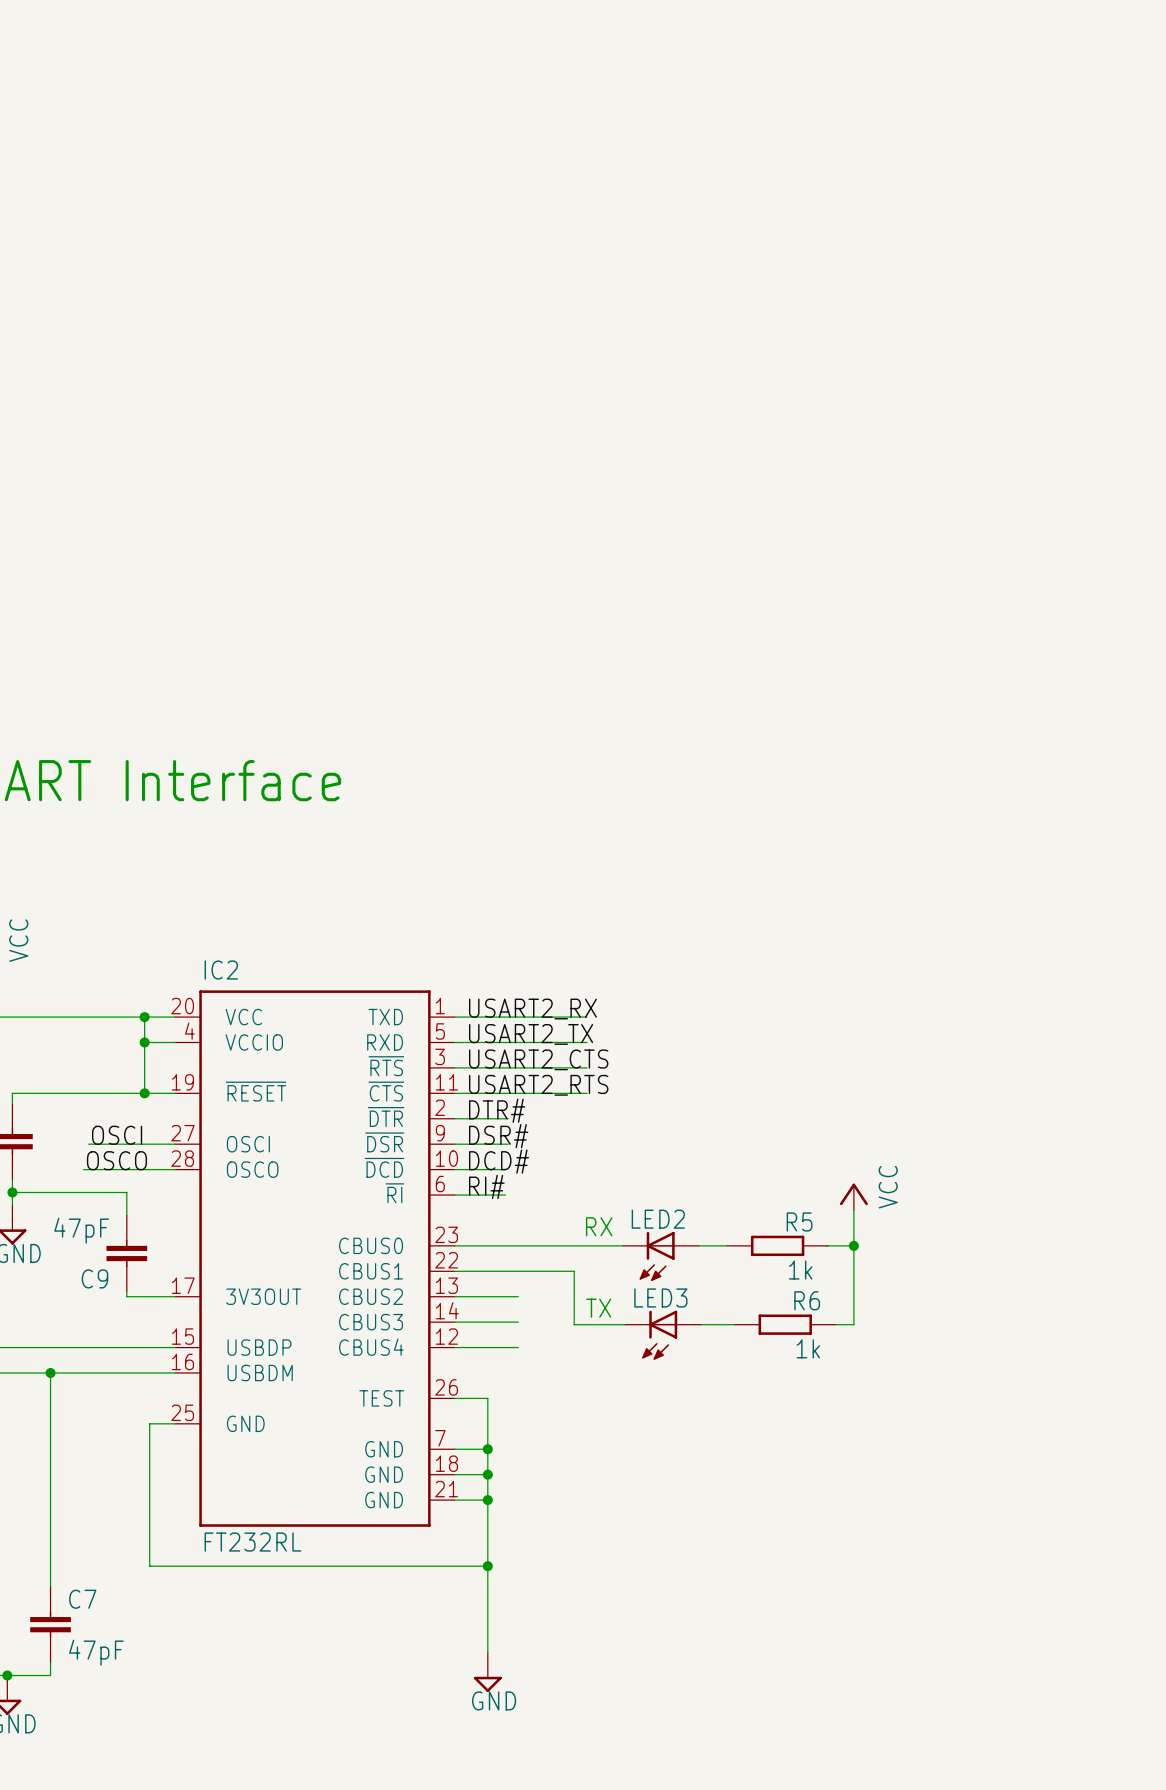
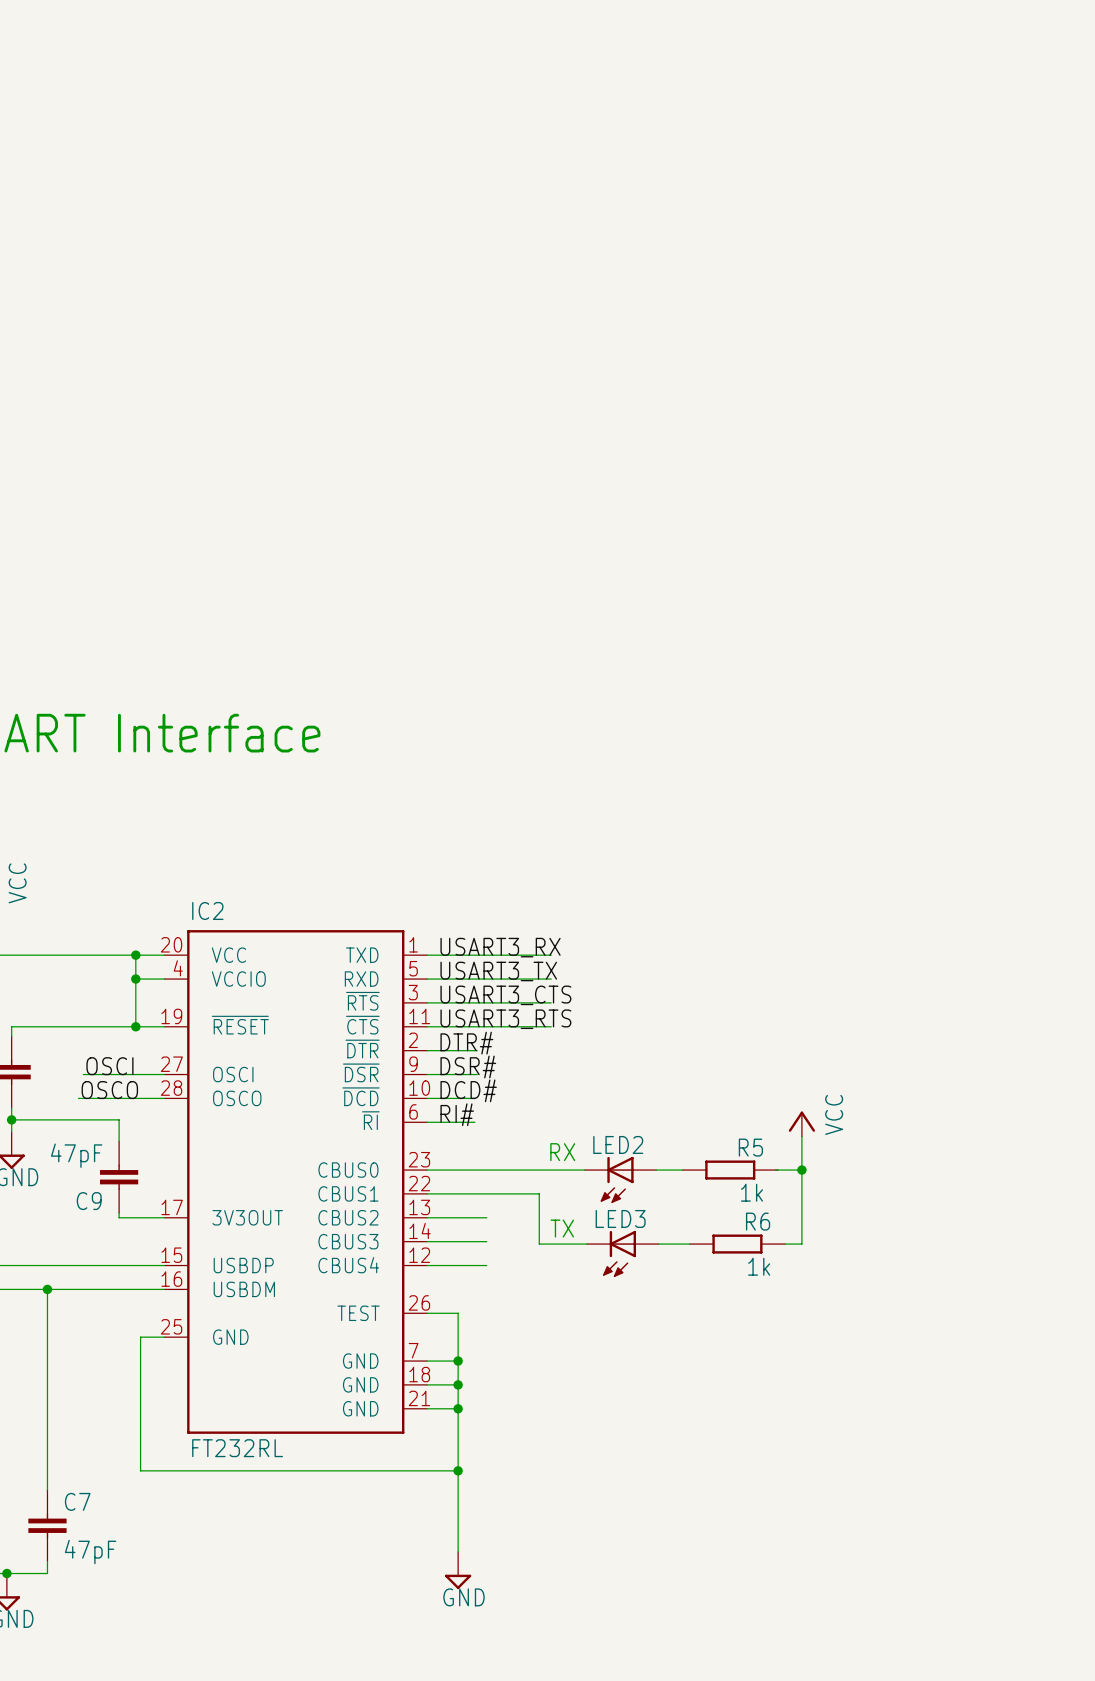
label: USART2_RX (532, 1009) -> USART3_RX (500, 947)
label: USART2_TX (531, 1034) -> USART3_TX (498, 971)
label: USART2_CTS (538, 1059) -> USART3_CTS (505, 995)
label: USART2_RTS (538, 1085) -> USART3_RTS (505, 1019)

